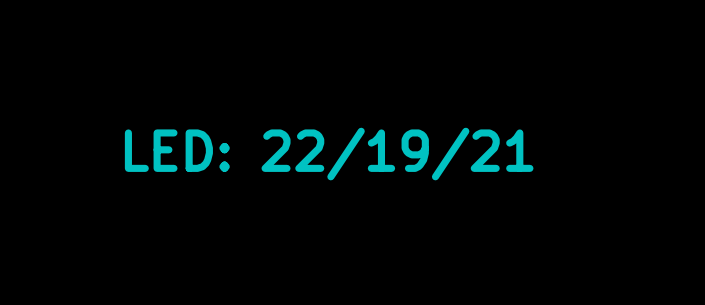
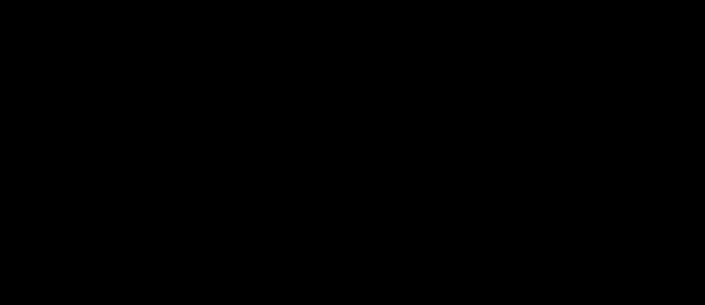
text: LED: 22/19/21 (329, 154) -> none

